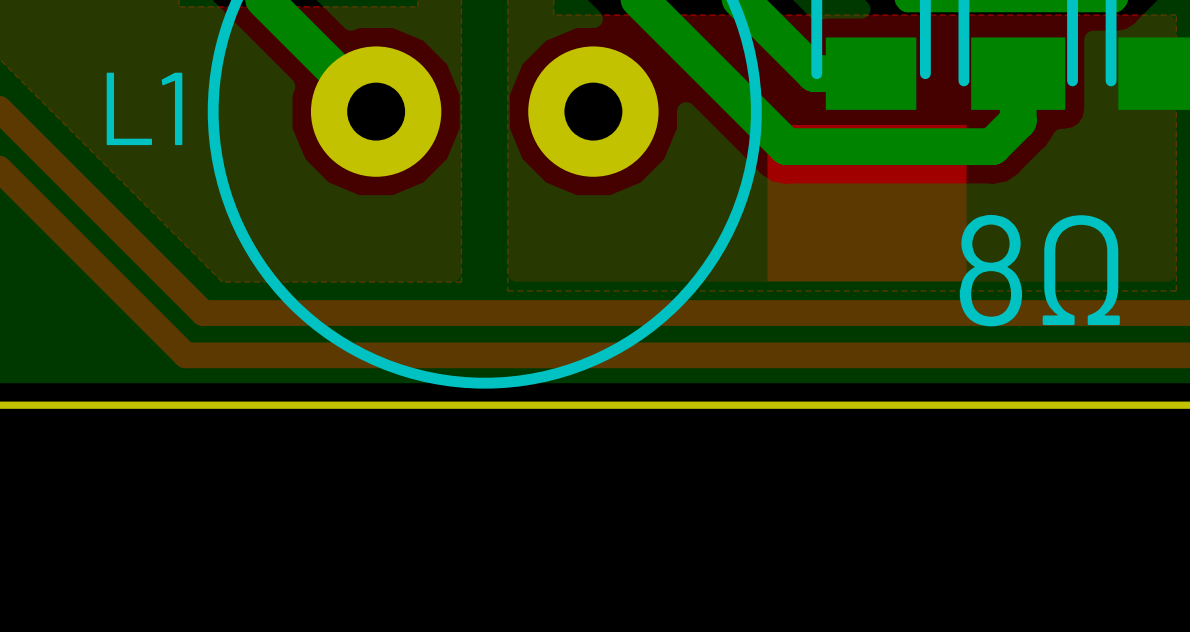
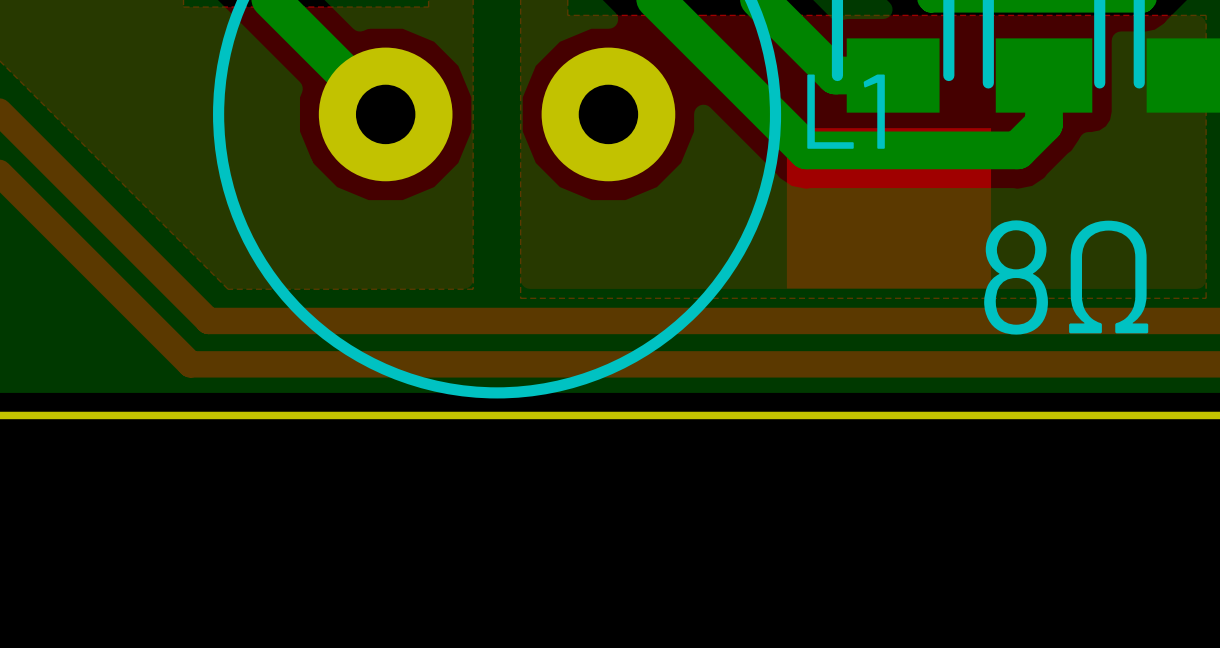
L1 name position: L1 (144, 108) -> L1 (846, 111)

